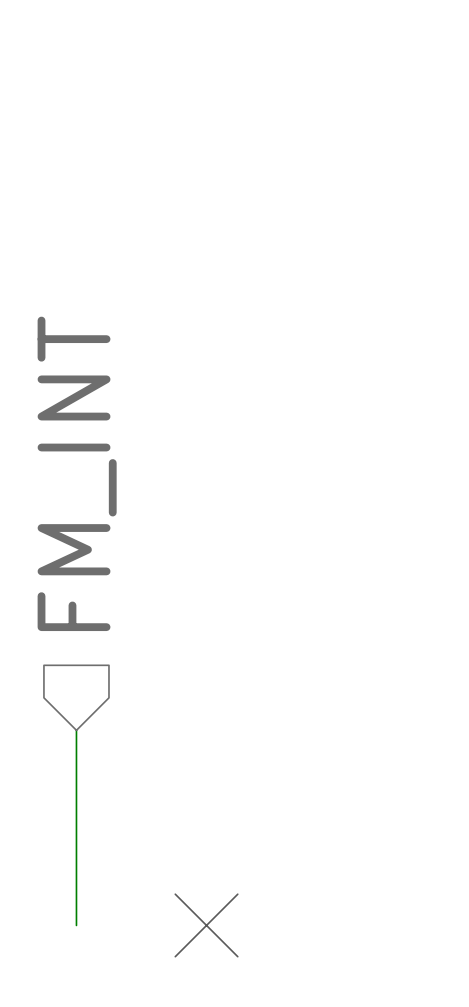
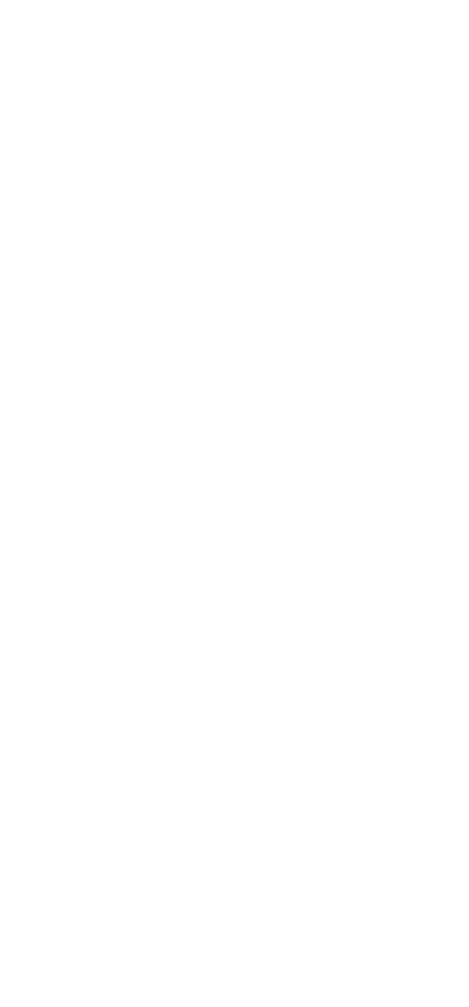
hierarchical label: FM_INT (77, 473) -> none
wire: (76, 730) (76, 925) -> none
no-connect mark: (206, 925) -> none

